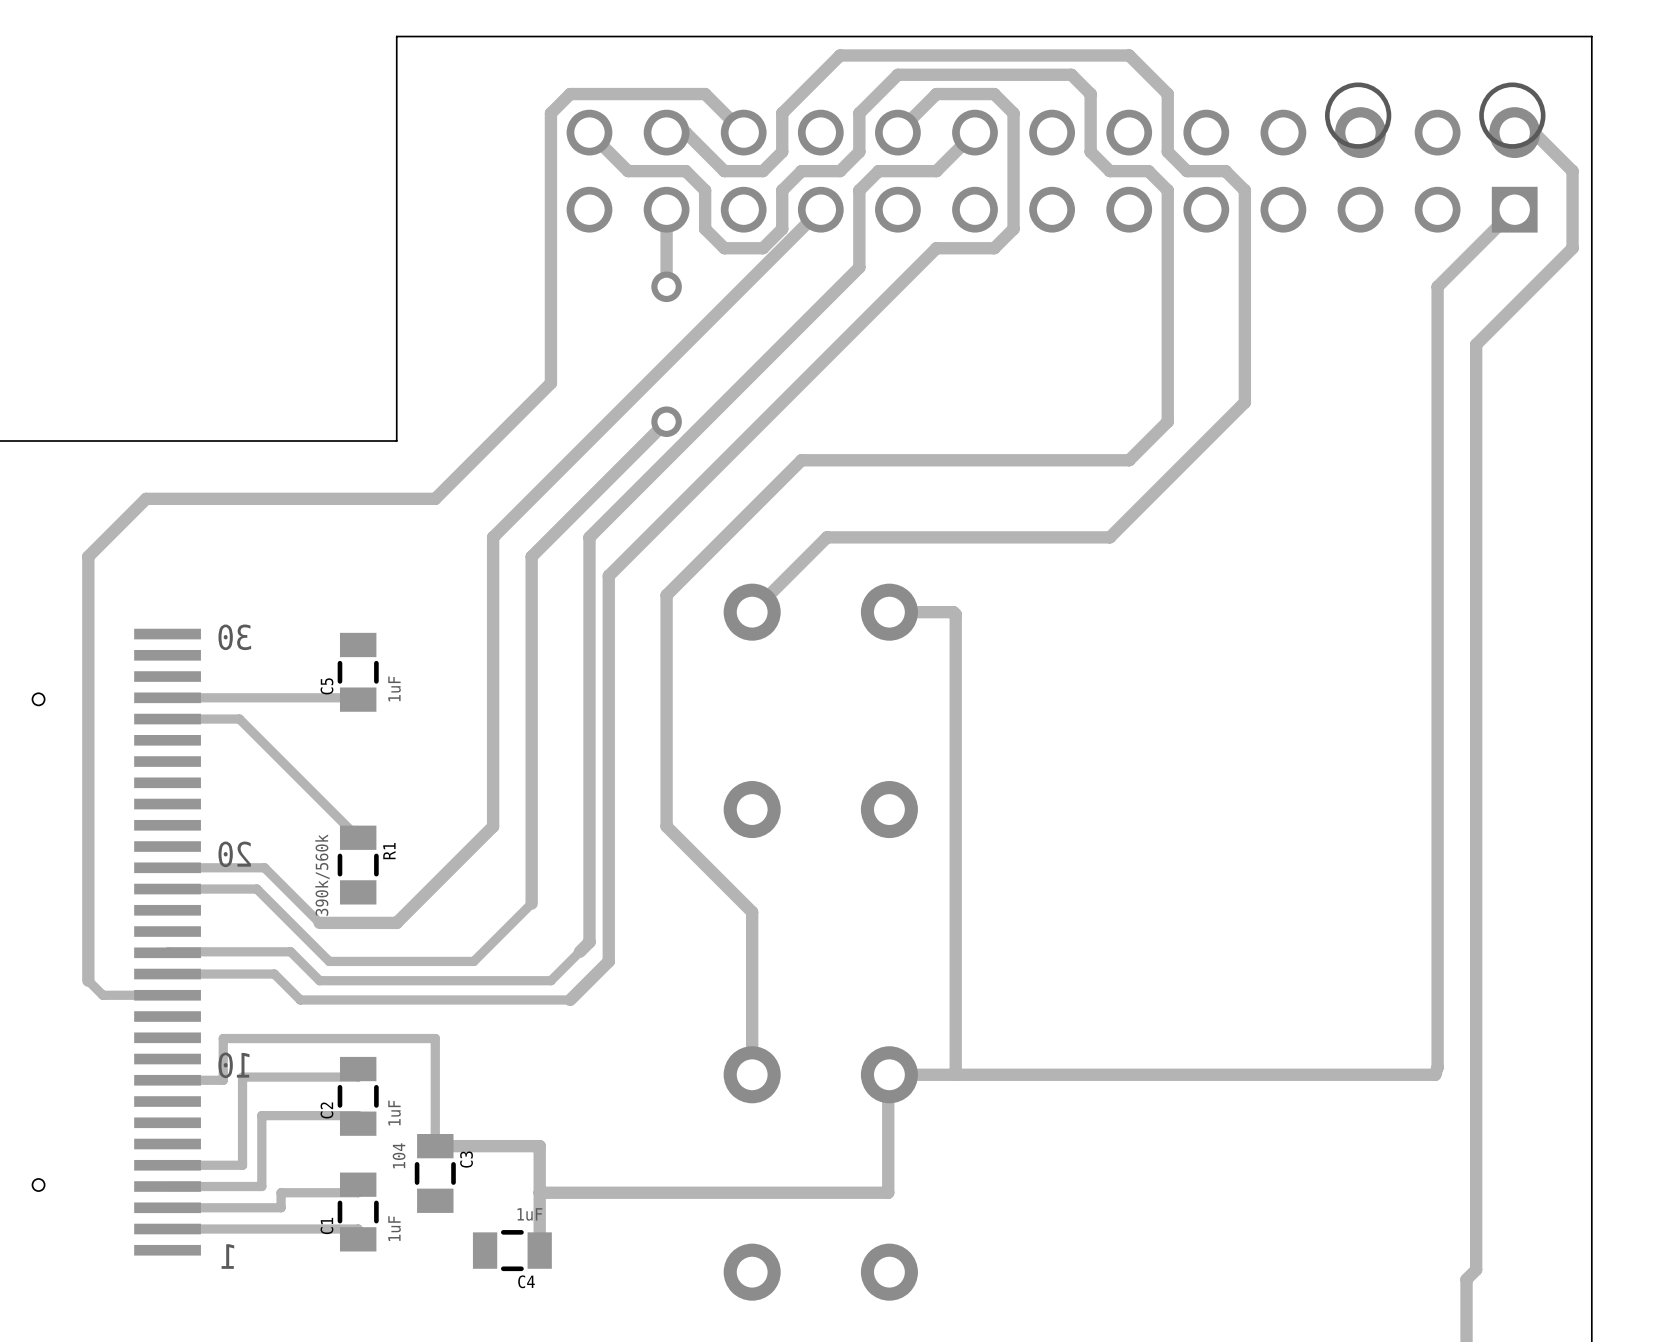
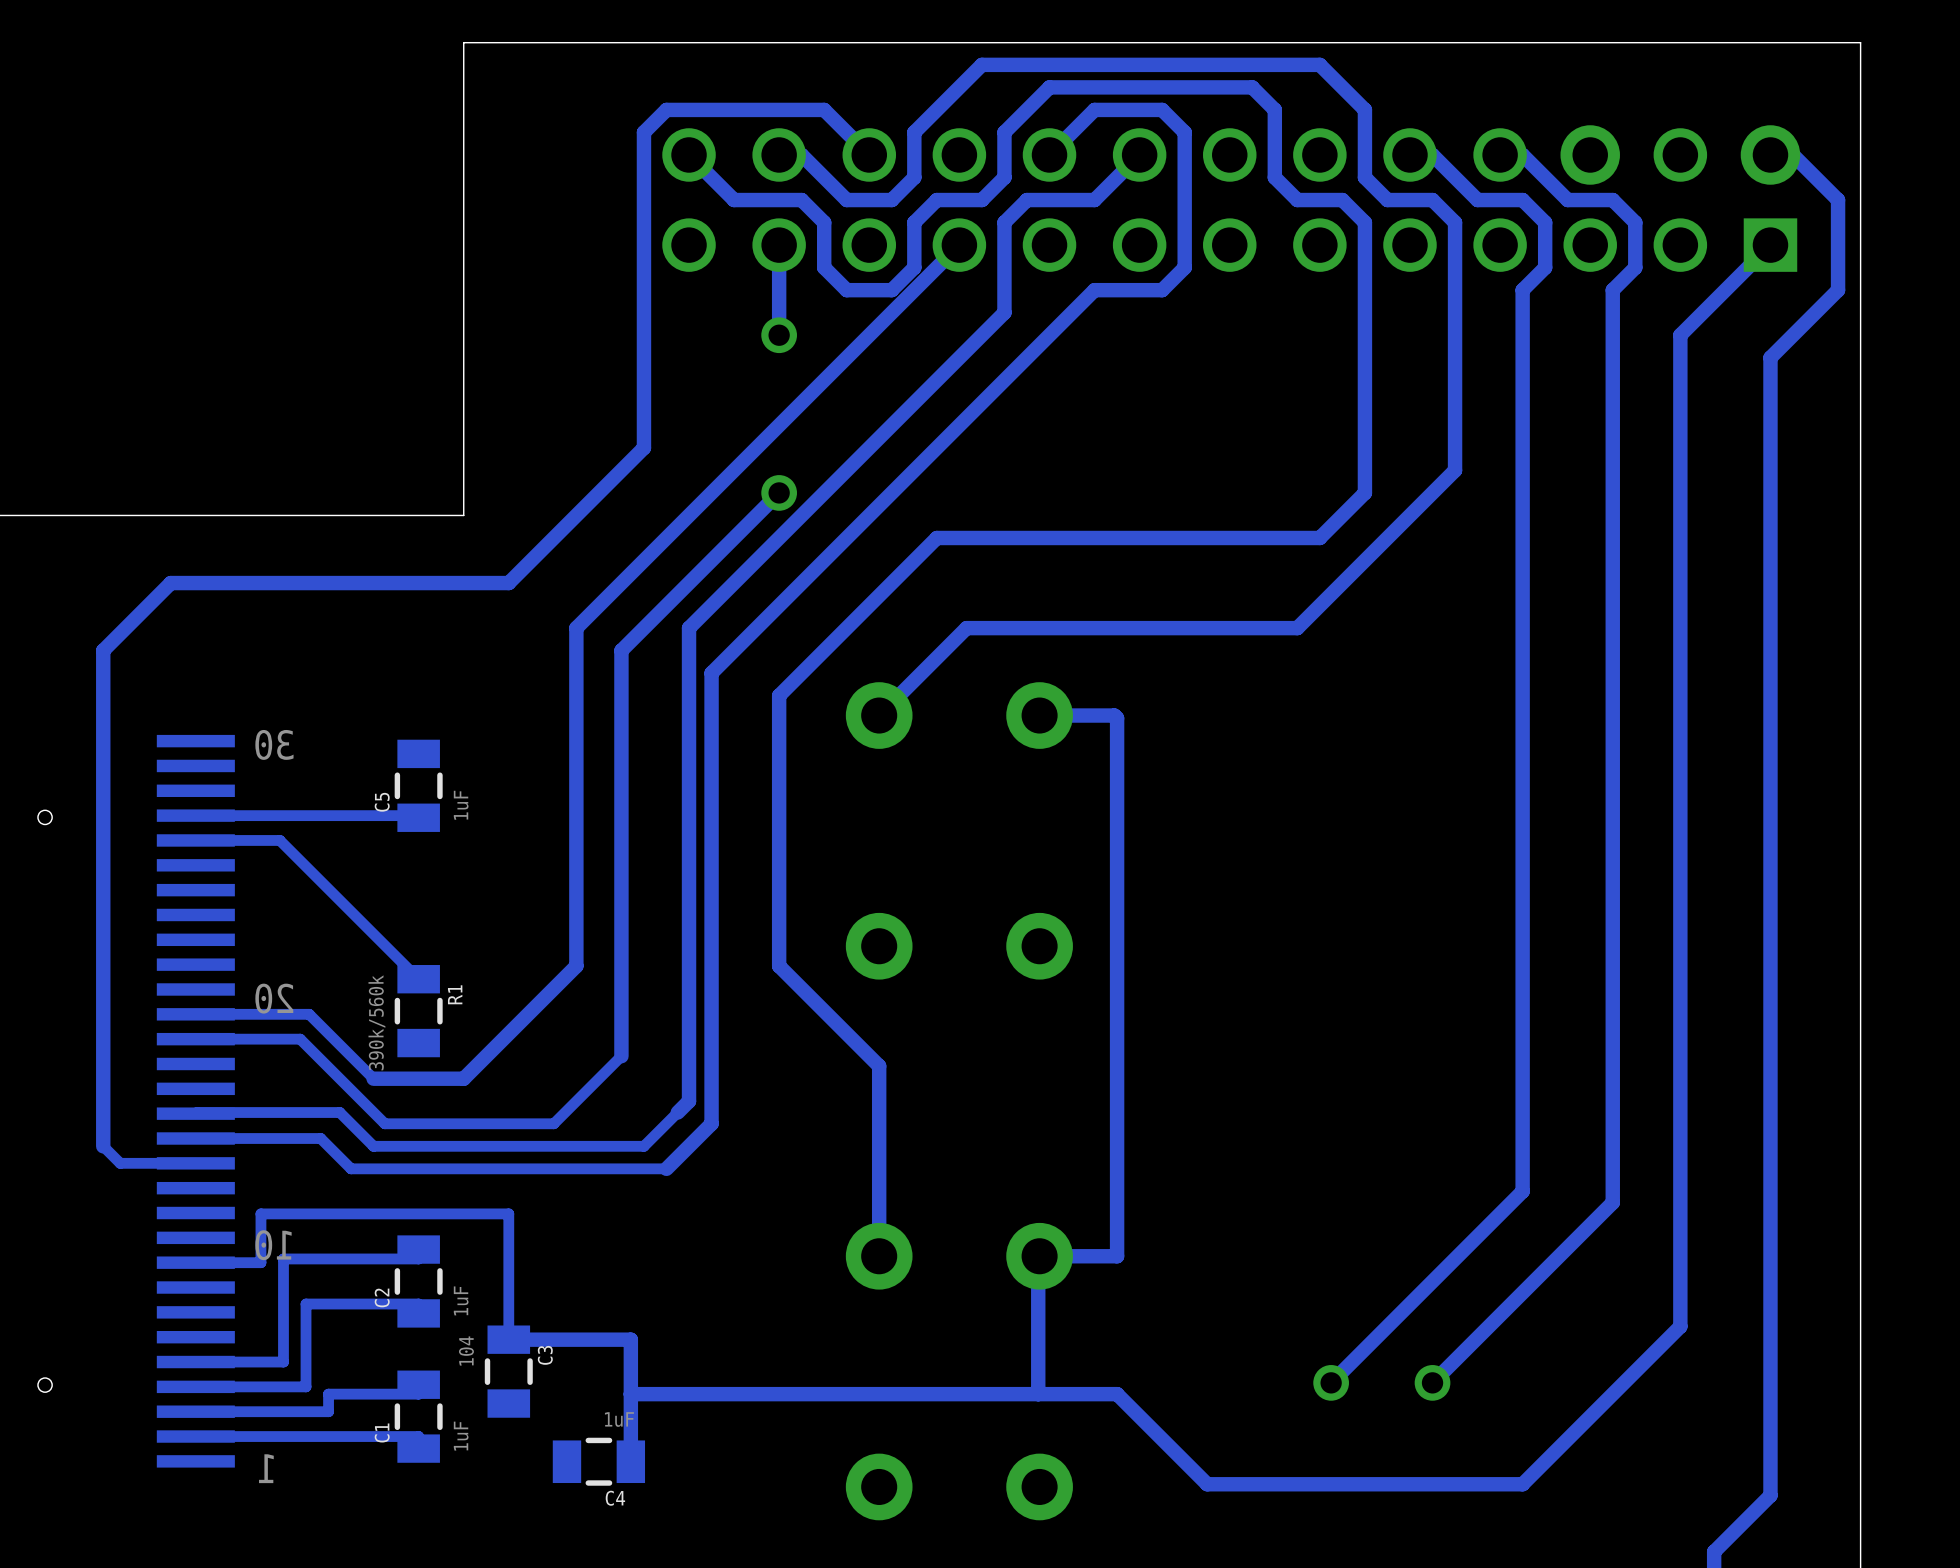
part footprint: [566, 82, 1546, 233] -> [662, 125, 1801, 272]
track: none -> (1409, 154) (1432, 154) (1477, 200) (1522, 200) (1545, 222) (1545, 267) (1522, 290) (1522, 1191) (1331, 1382)
track: none -> (1500, 154) (1522, 154) (1567, 200) (1612, 200) (1635, 222) (1635, 267) (1612, 290) (1612, 1202) (1432, 1382)
track: (1514, 306) (1476, 344) (1476, 1269) (1466, 1279) (1466, 1327) -> (1770, 357) (1770, 1495) (1714, 1551)
track: (1437, 1067) (1435, 1074) (955, 1074) -> (1680, 1247) (1680, 1326) (1522, 1484) (1207, 1484) (1117, 1394) (1038, 1394)
via: none -> (1331, 1382)
via: none -> (1432, 1382)

